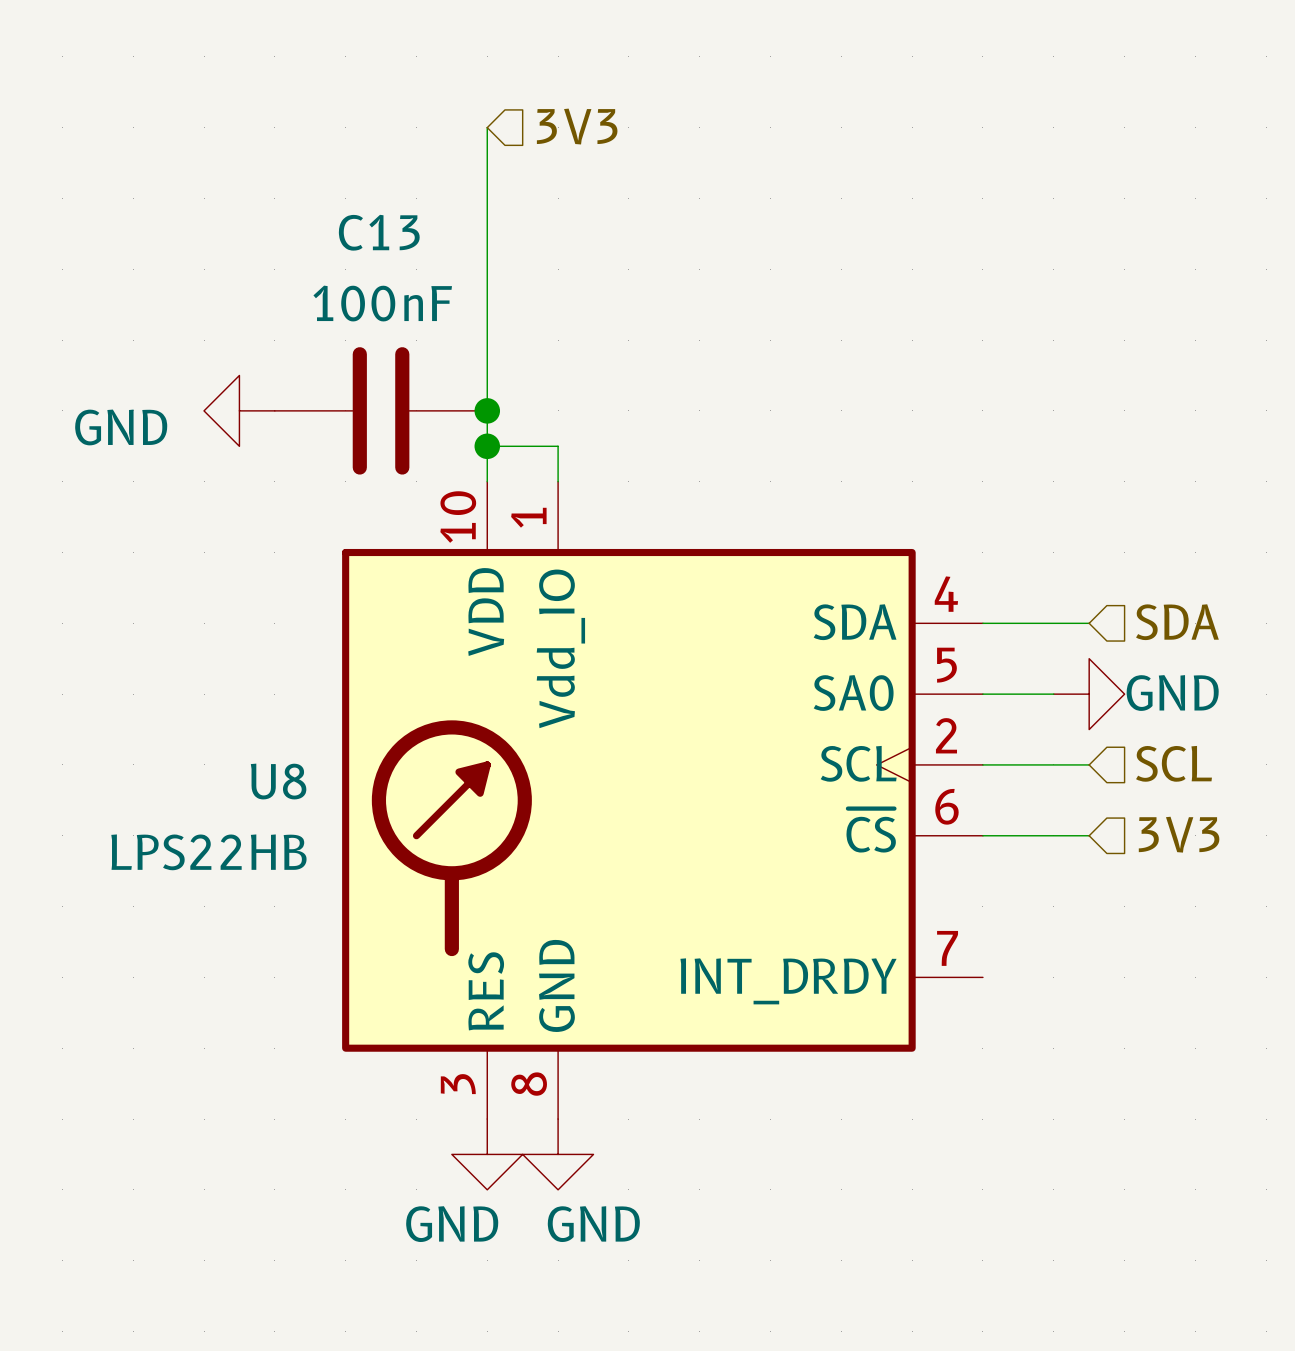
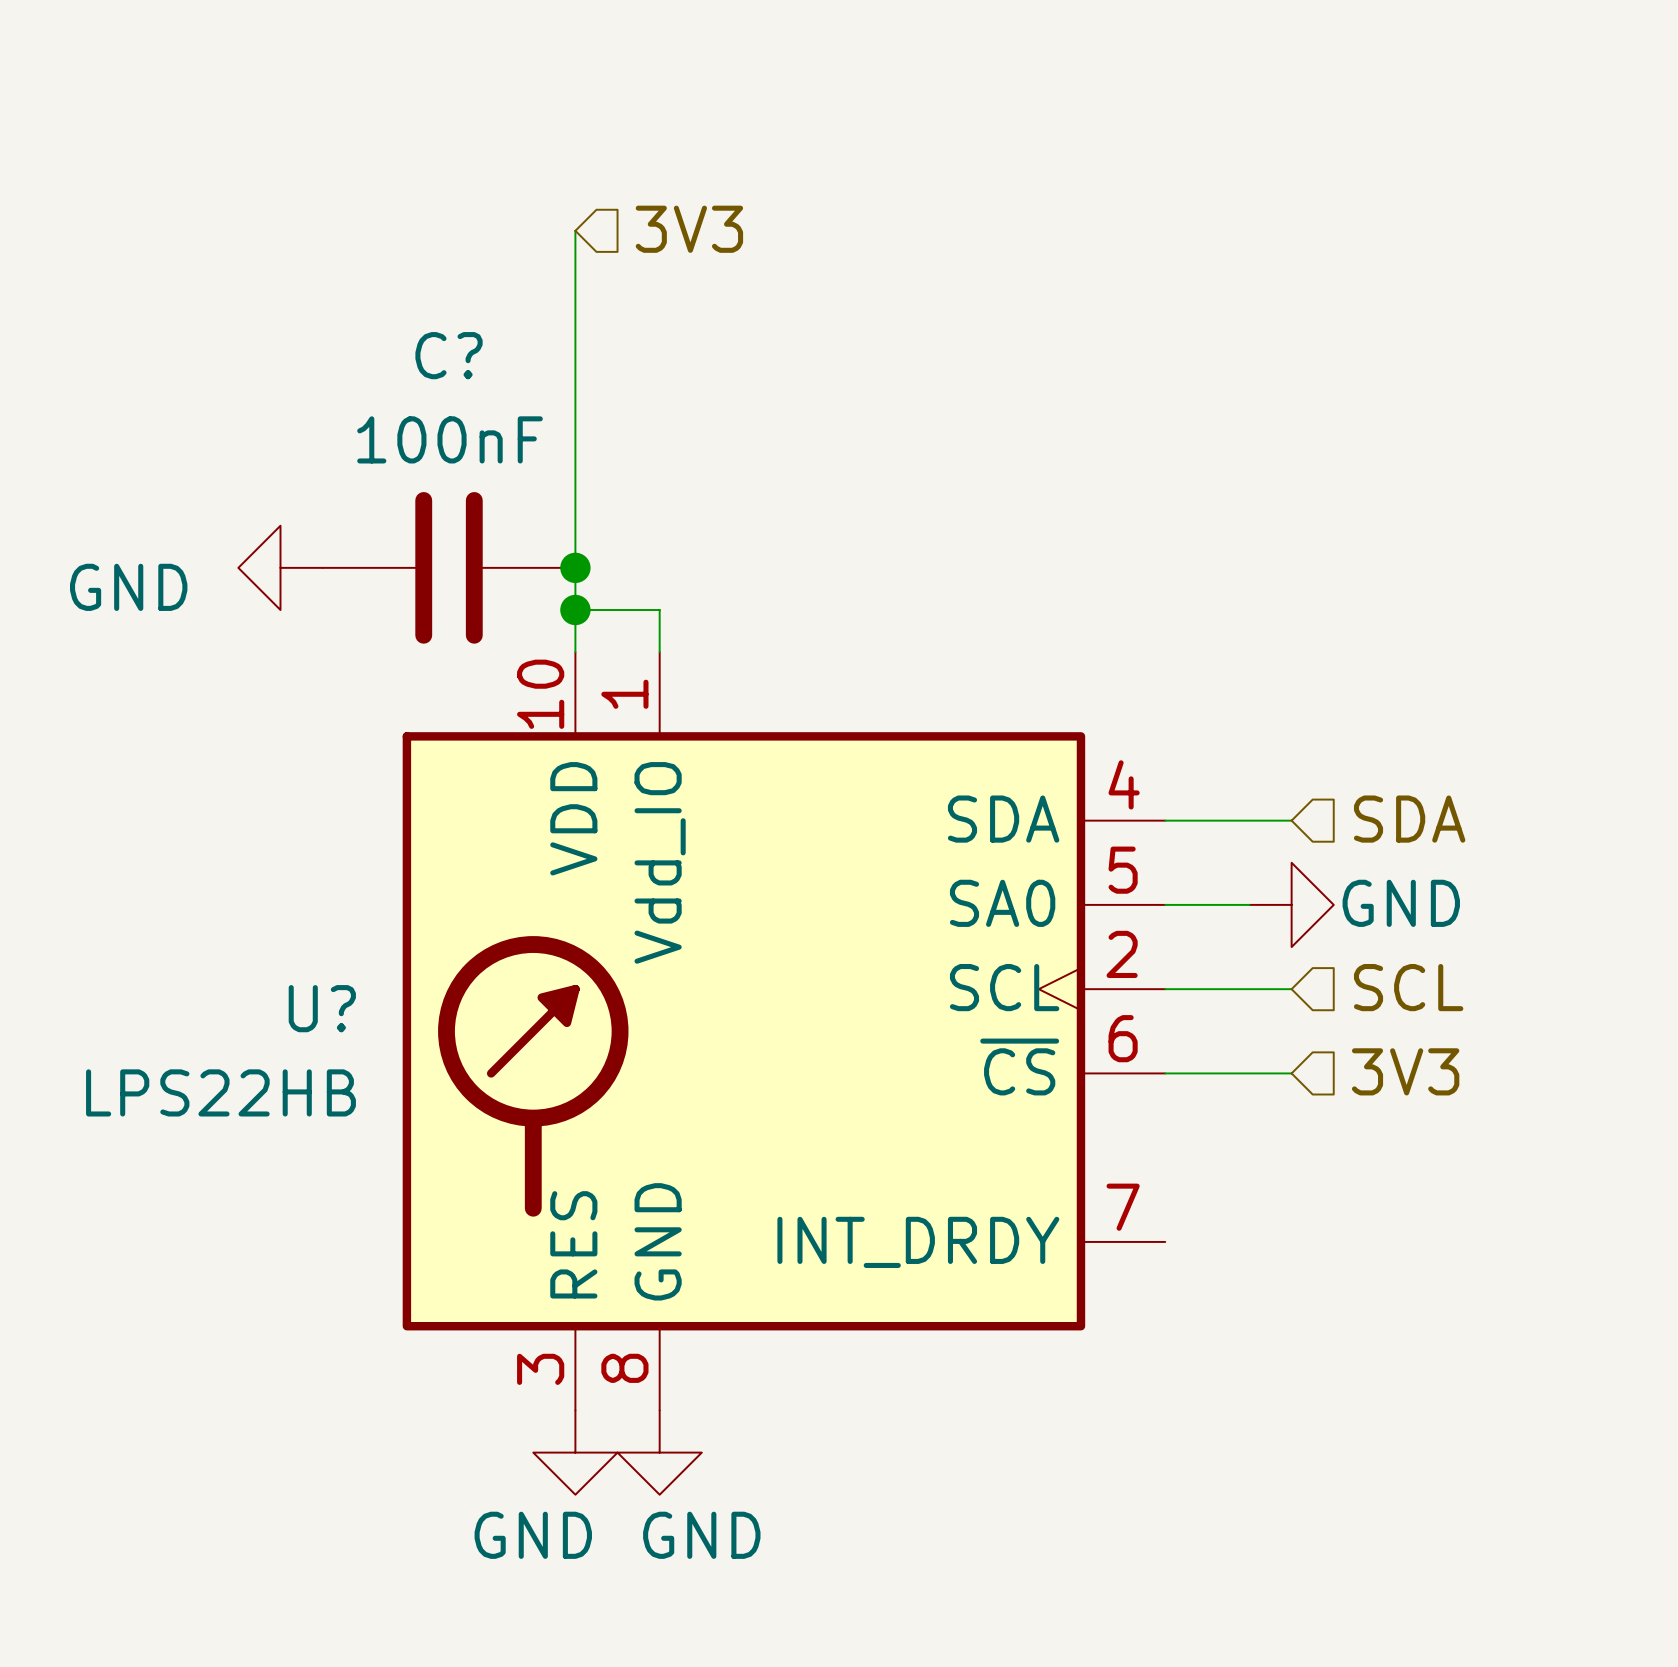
C13 name: C13 (379, 232) -> C? (449, 355)
U8 name: U8 (278, 781) -> U? (322, 1008)

